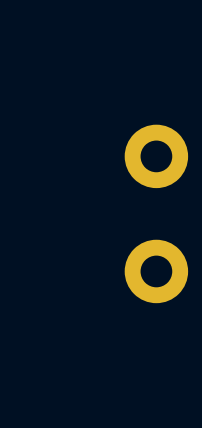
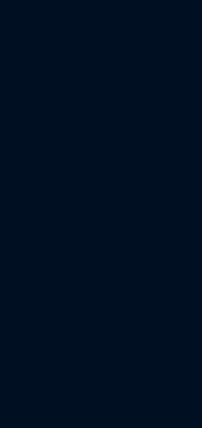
part: (156, 213) -> none

